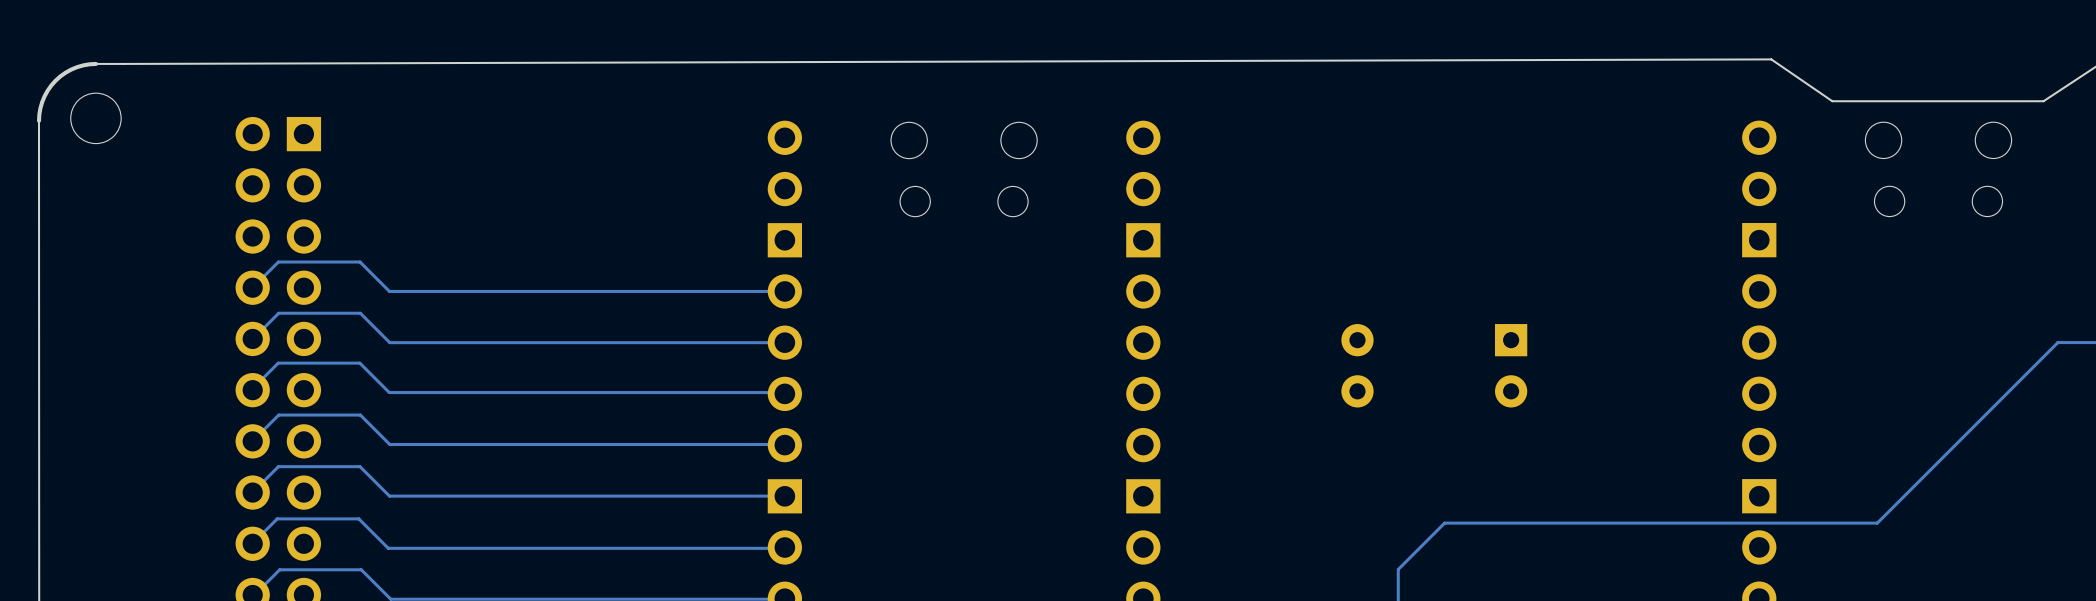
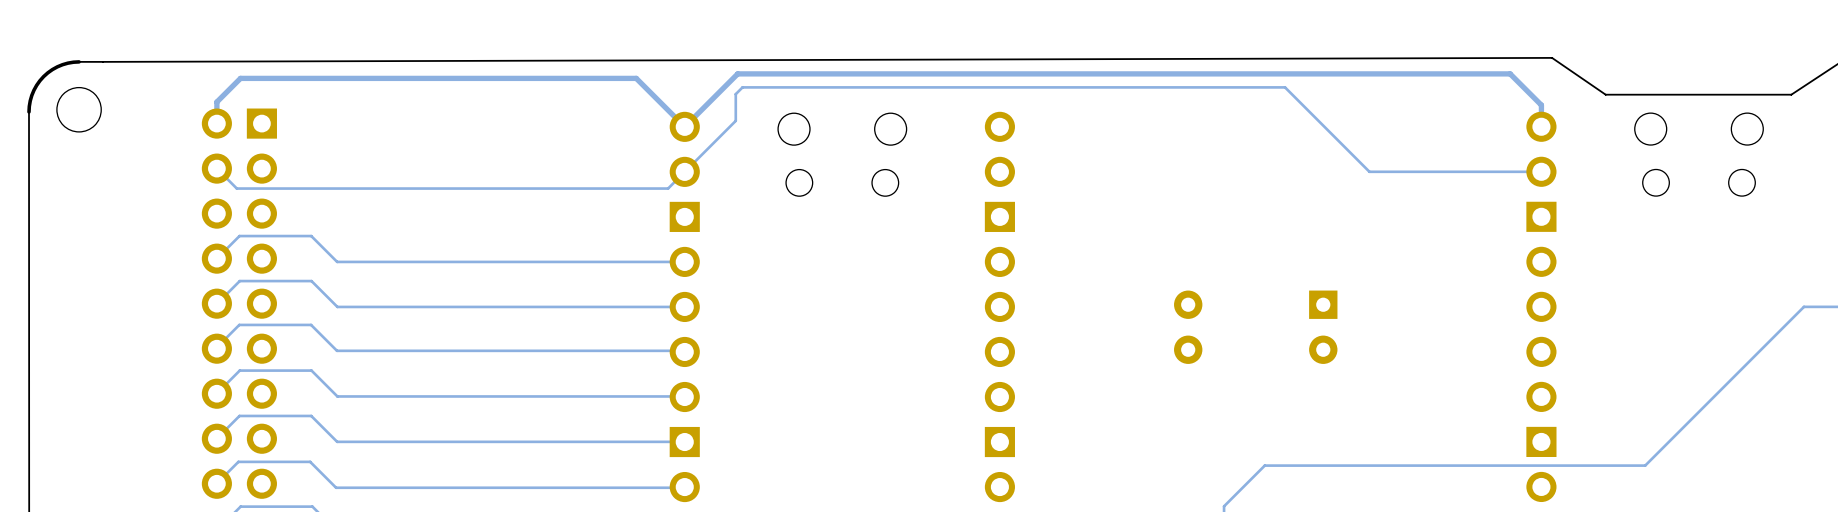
track: none -> (216, 123) (216, 102) (240, 78) (636, 78) (684, 126) (737, 73) (1510, 73) (1541, 105) (1541, 126)
track: none -> (216, 168) (236, 188) (668, 188) (735, 120) (735, 94) (742, 87) (1285, 87) (1369, 171) (1541, 171)

